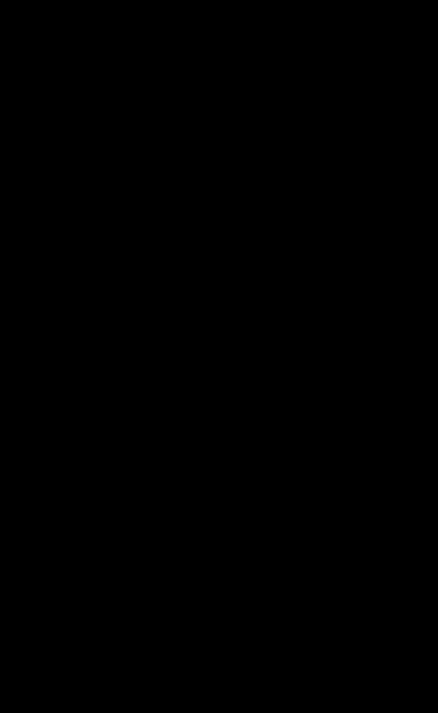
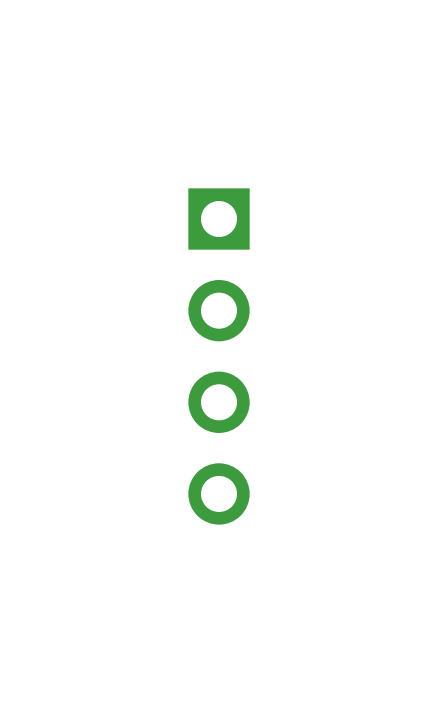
part: none -> (219, 356)

